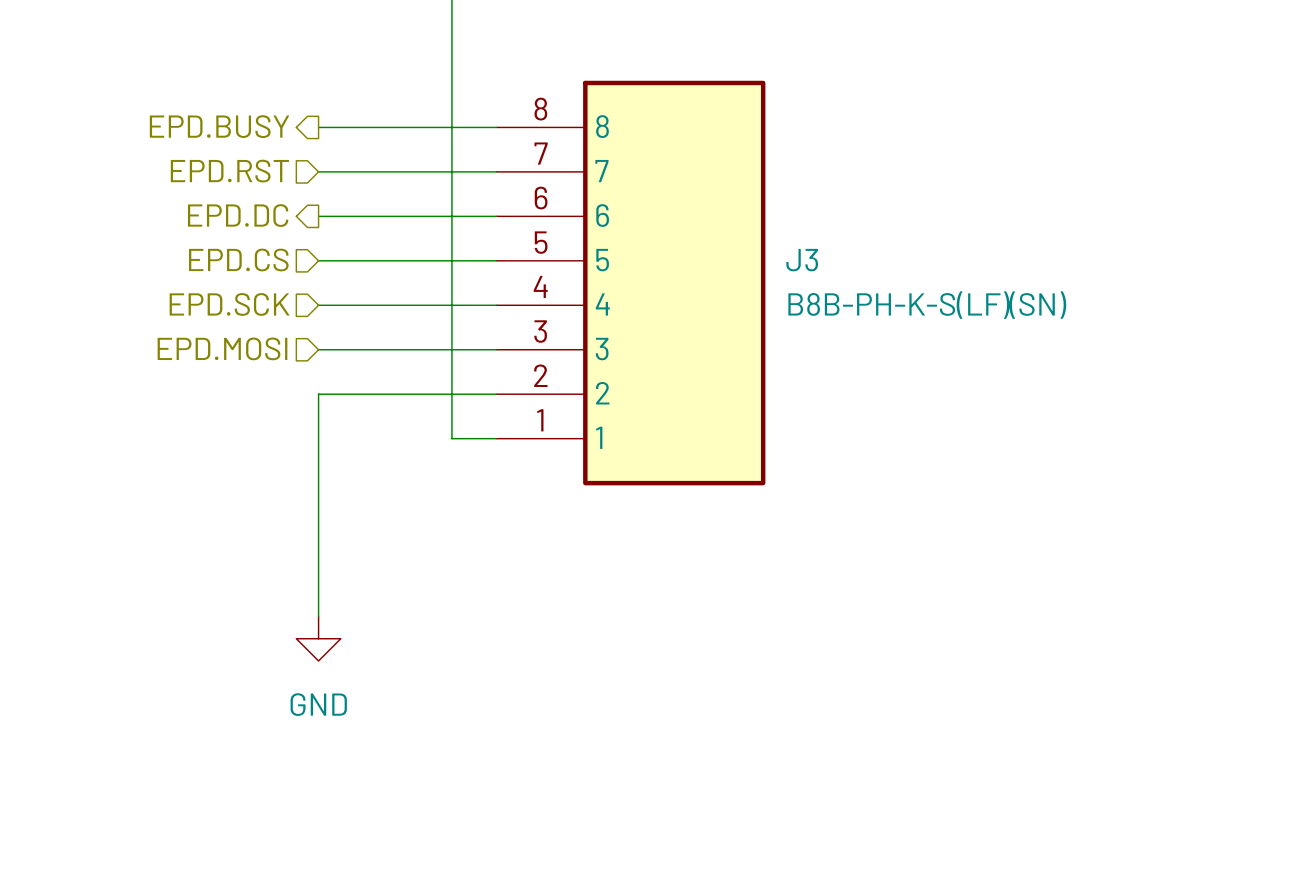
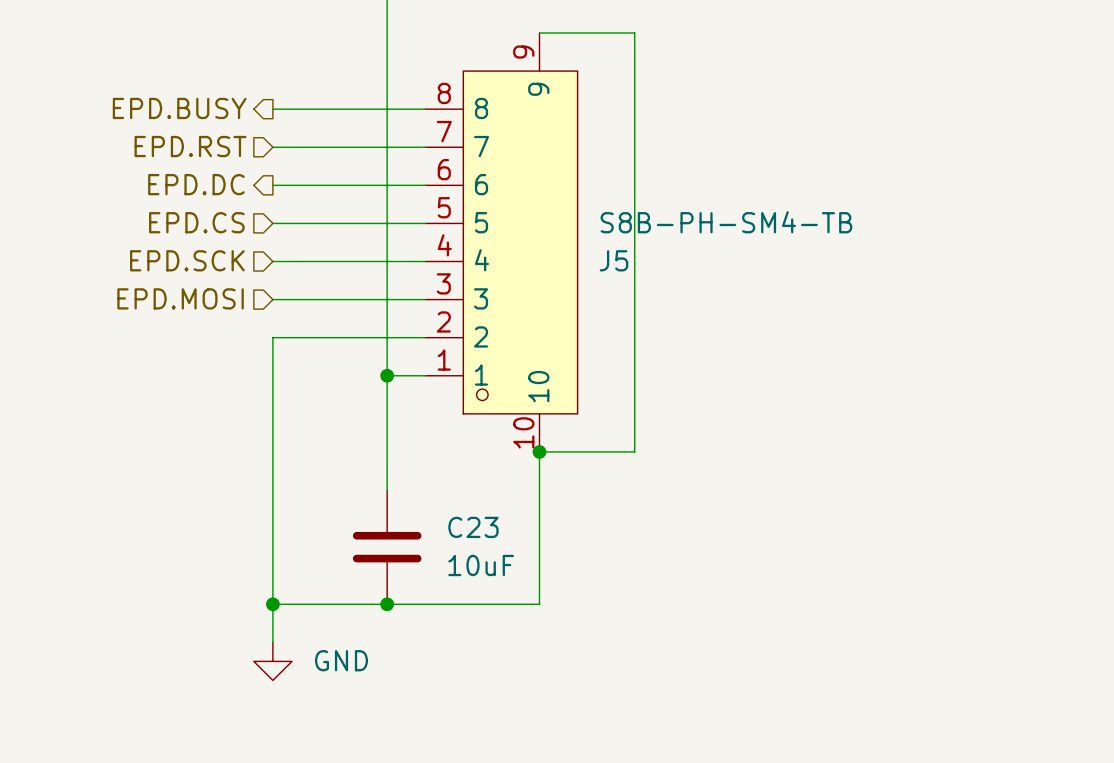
wire: none -> (539, 33) (634, 33) (634, 451) (539, 451) (539, 604) (272, 604)
J5: none -> S8B-PH-SM4-TB (501, 242)
J3: B8B-PH-K-S(LF)(SN) (630, 283) -> none
wire: none -> (387, 375) (387, 490)
junction: none -> (387, 375)
junction: none -> (539, 451)
wire: none -> (272, 528) (272, 642)
power symbol position: GND (318, 638) -> GND (272, 661)
C23: none -> 10uF (387, 547)
power symbol text position: GND (318, 704) -> GND (341, 660)
junction: none -> (272, 604)
junction: none -> (387, 604)

